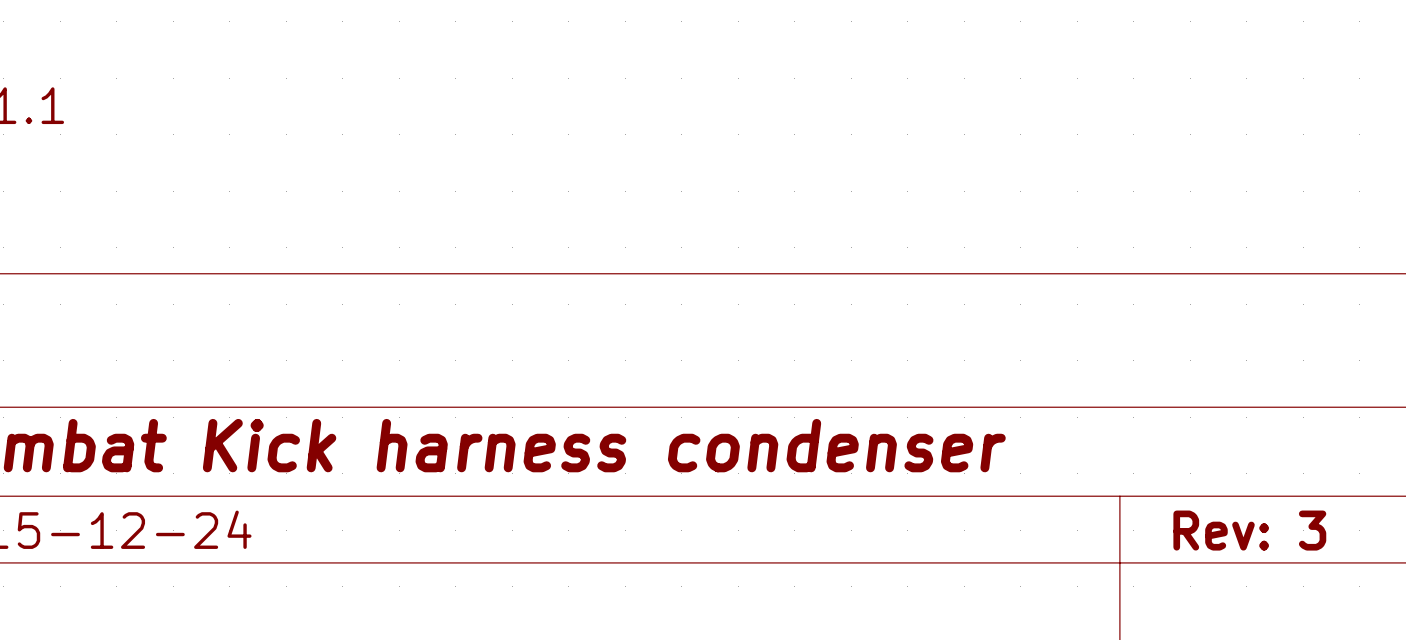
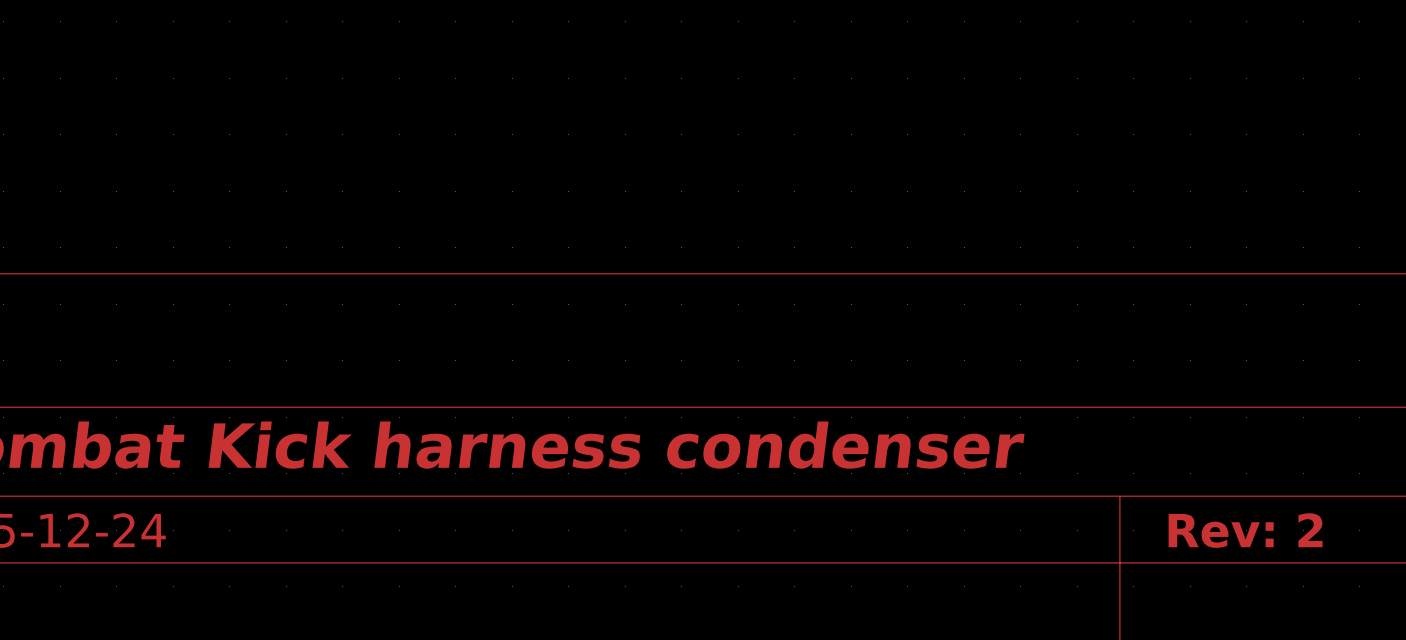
title block: Rev: 3 (1249, 530) -> Rev: 2 (1245, 530)

